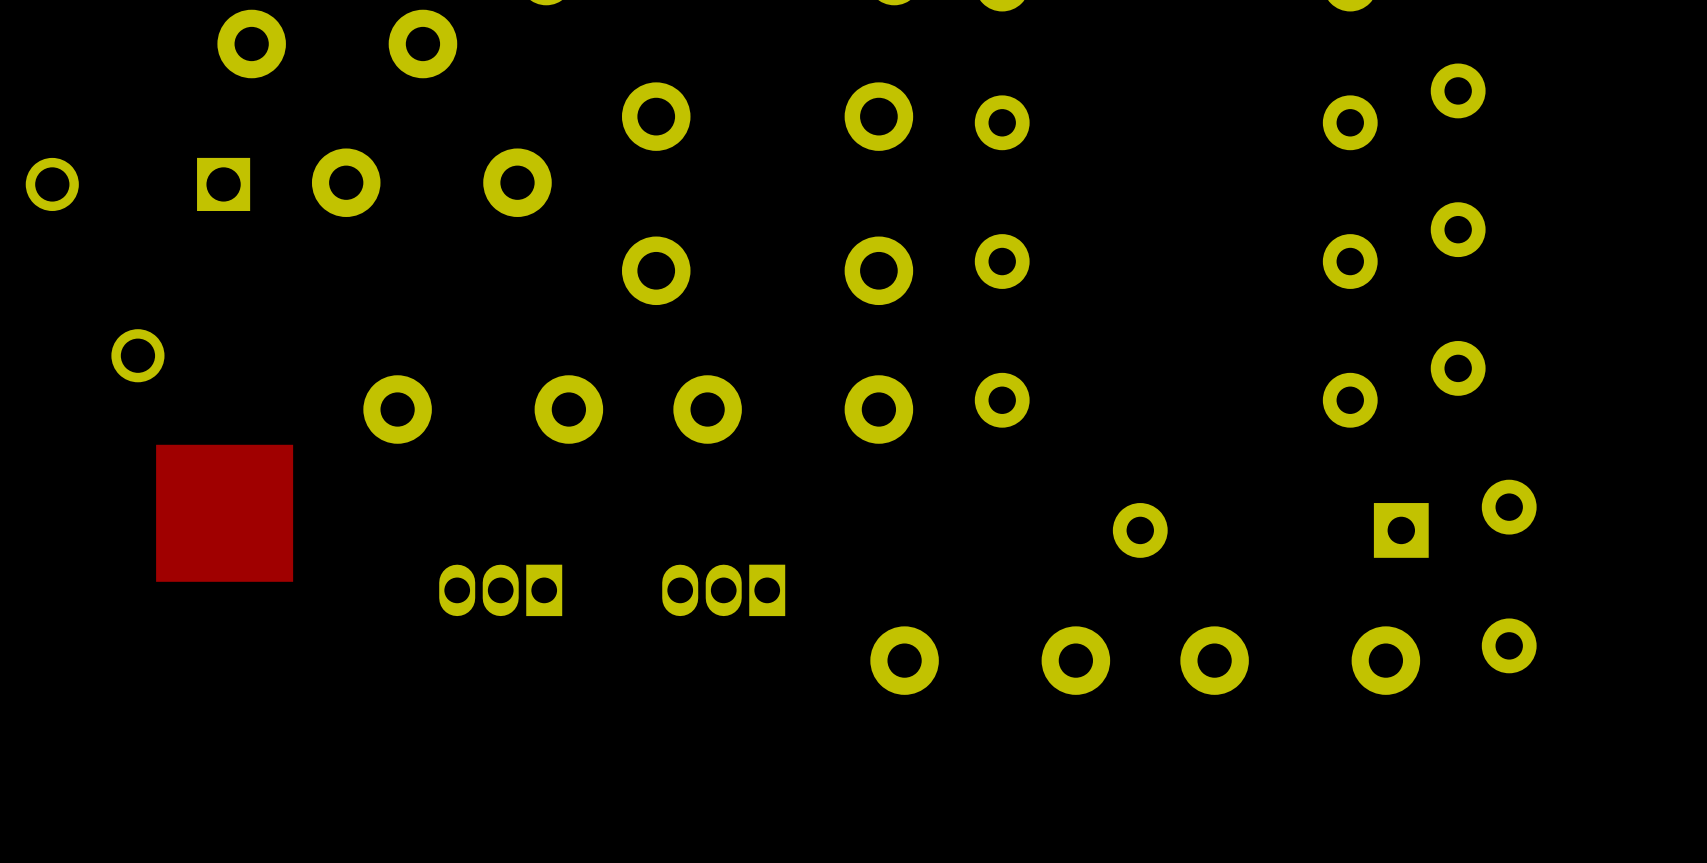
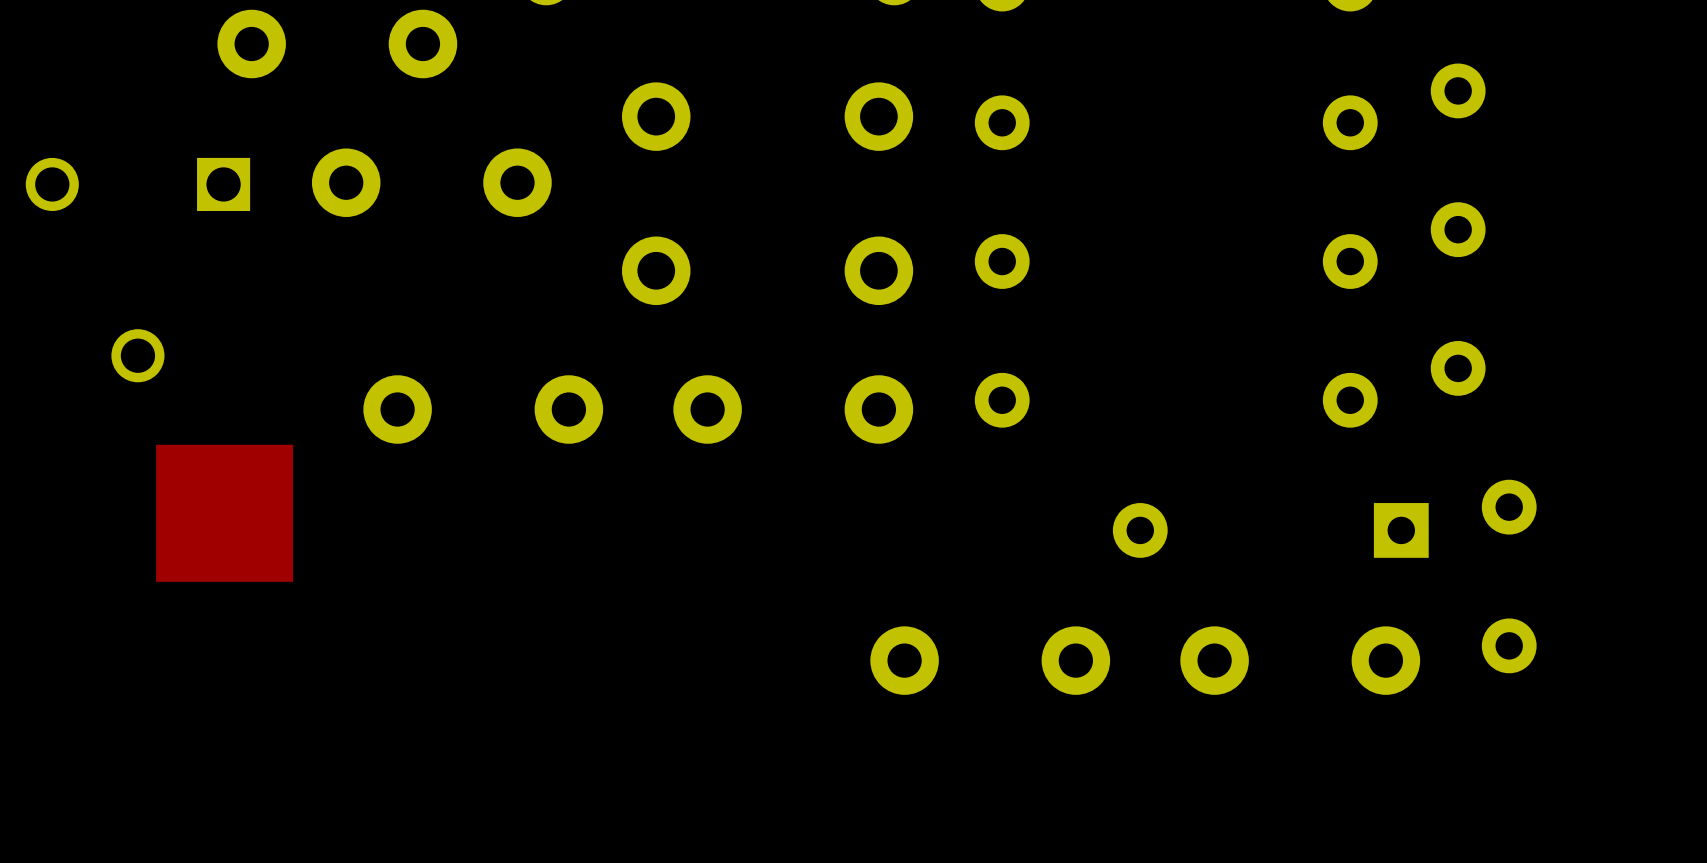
part: (500, 590) -> none
part: (723, 590) -> none

